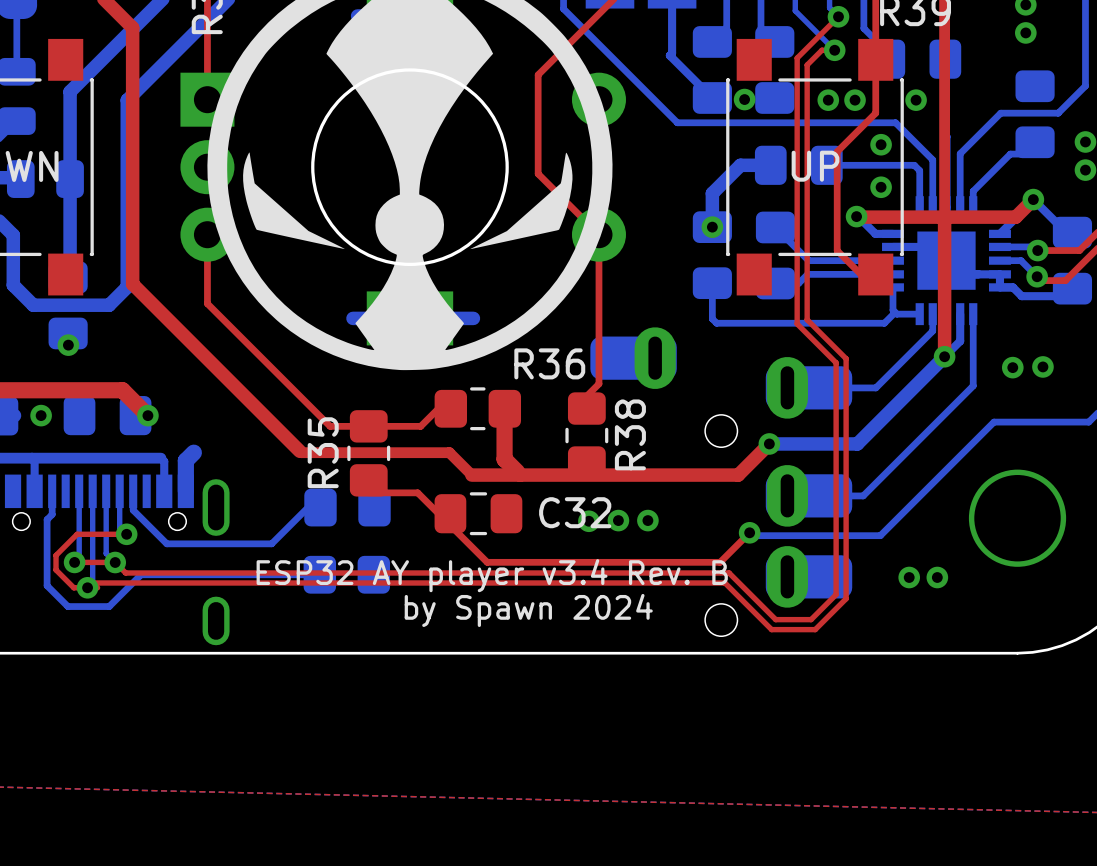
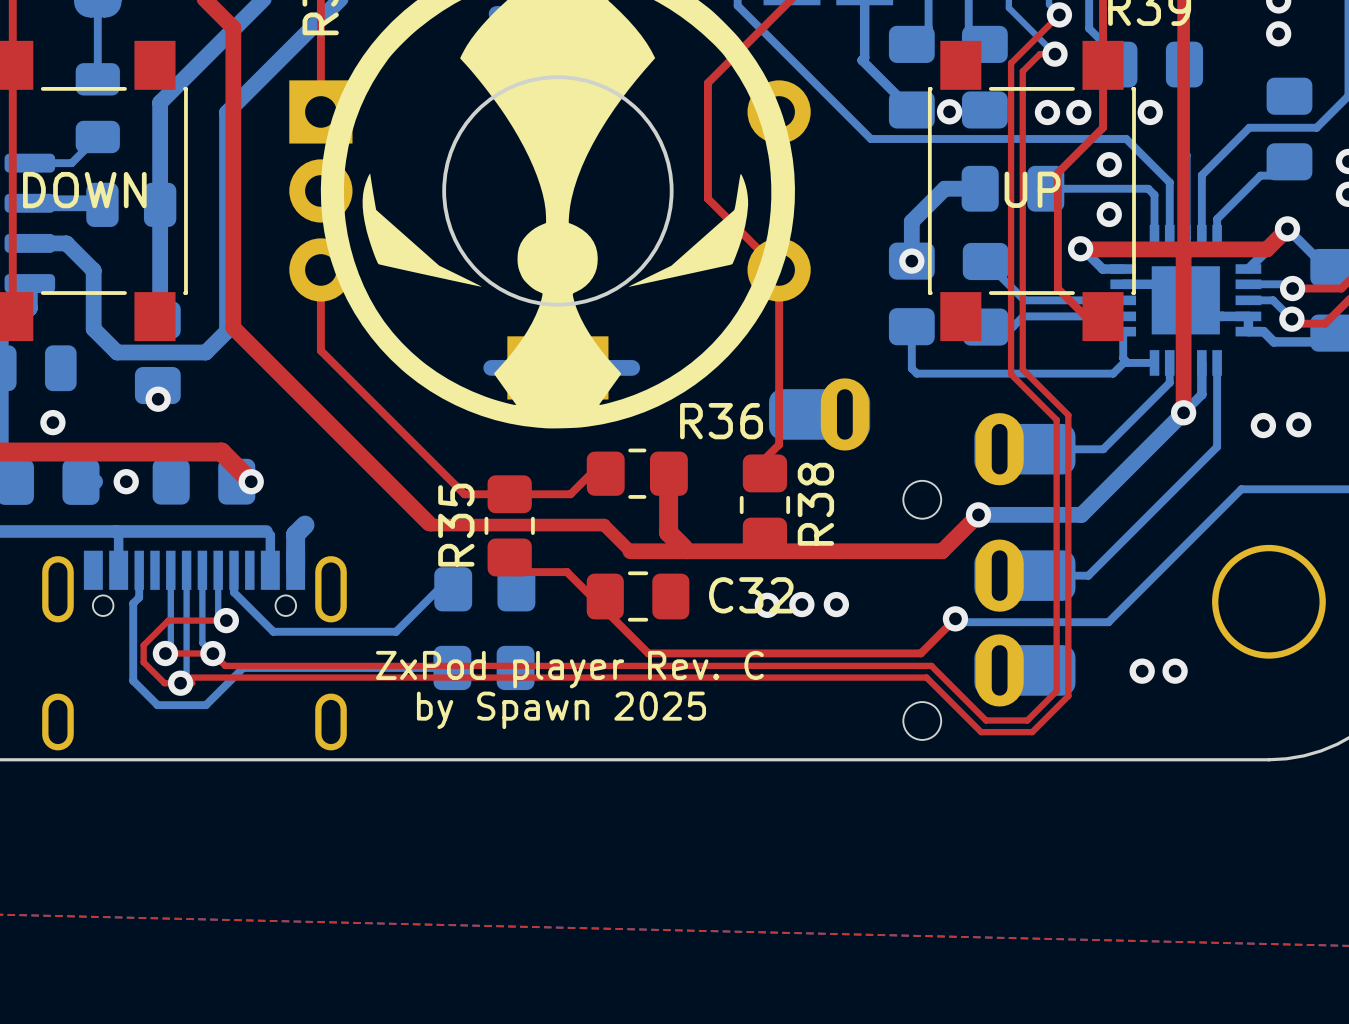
text: ESP32 AY player v3.4 Rev. B (492, 575) -> ZxPod player Rev. C (569, 669)
text: by Spawn 2024 (528, 610) -> by Spawn 2025 (561, 710)

